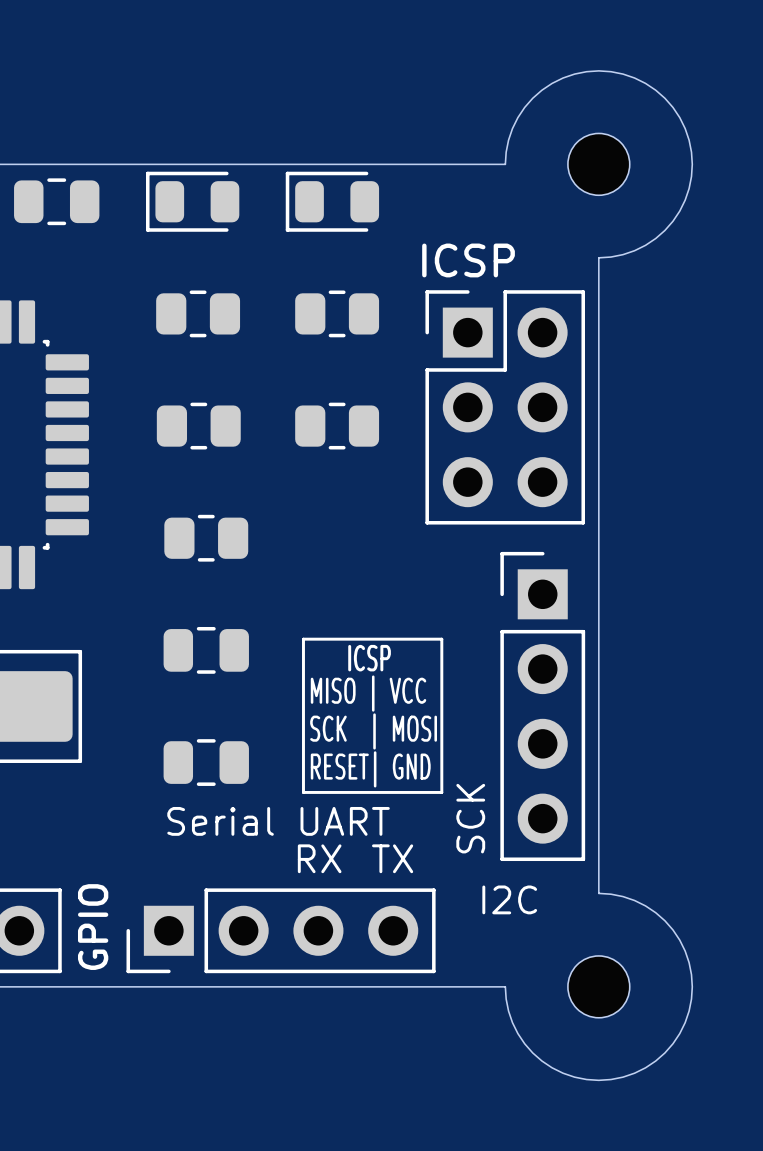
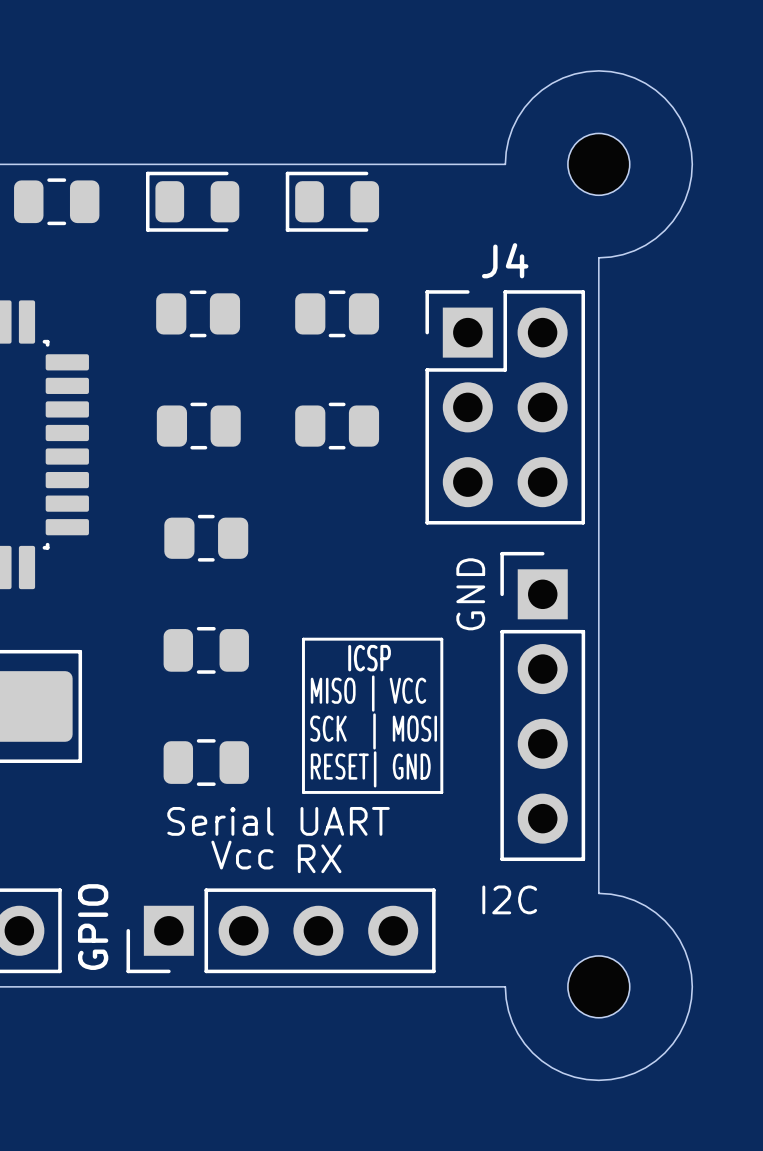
J4 text: ICSP (468, 260) -> none
J4 name: none -> J4 (505, 260)
part text: SCK (470, 818) -> GND (470, 594)
part text: TX (392, 858) -> Vcc (242, 855)

